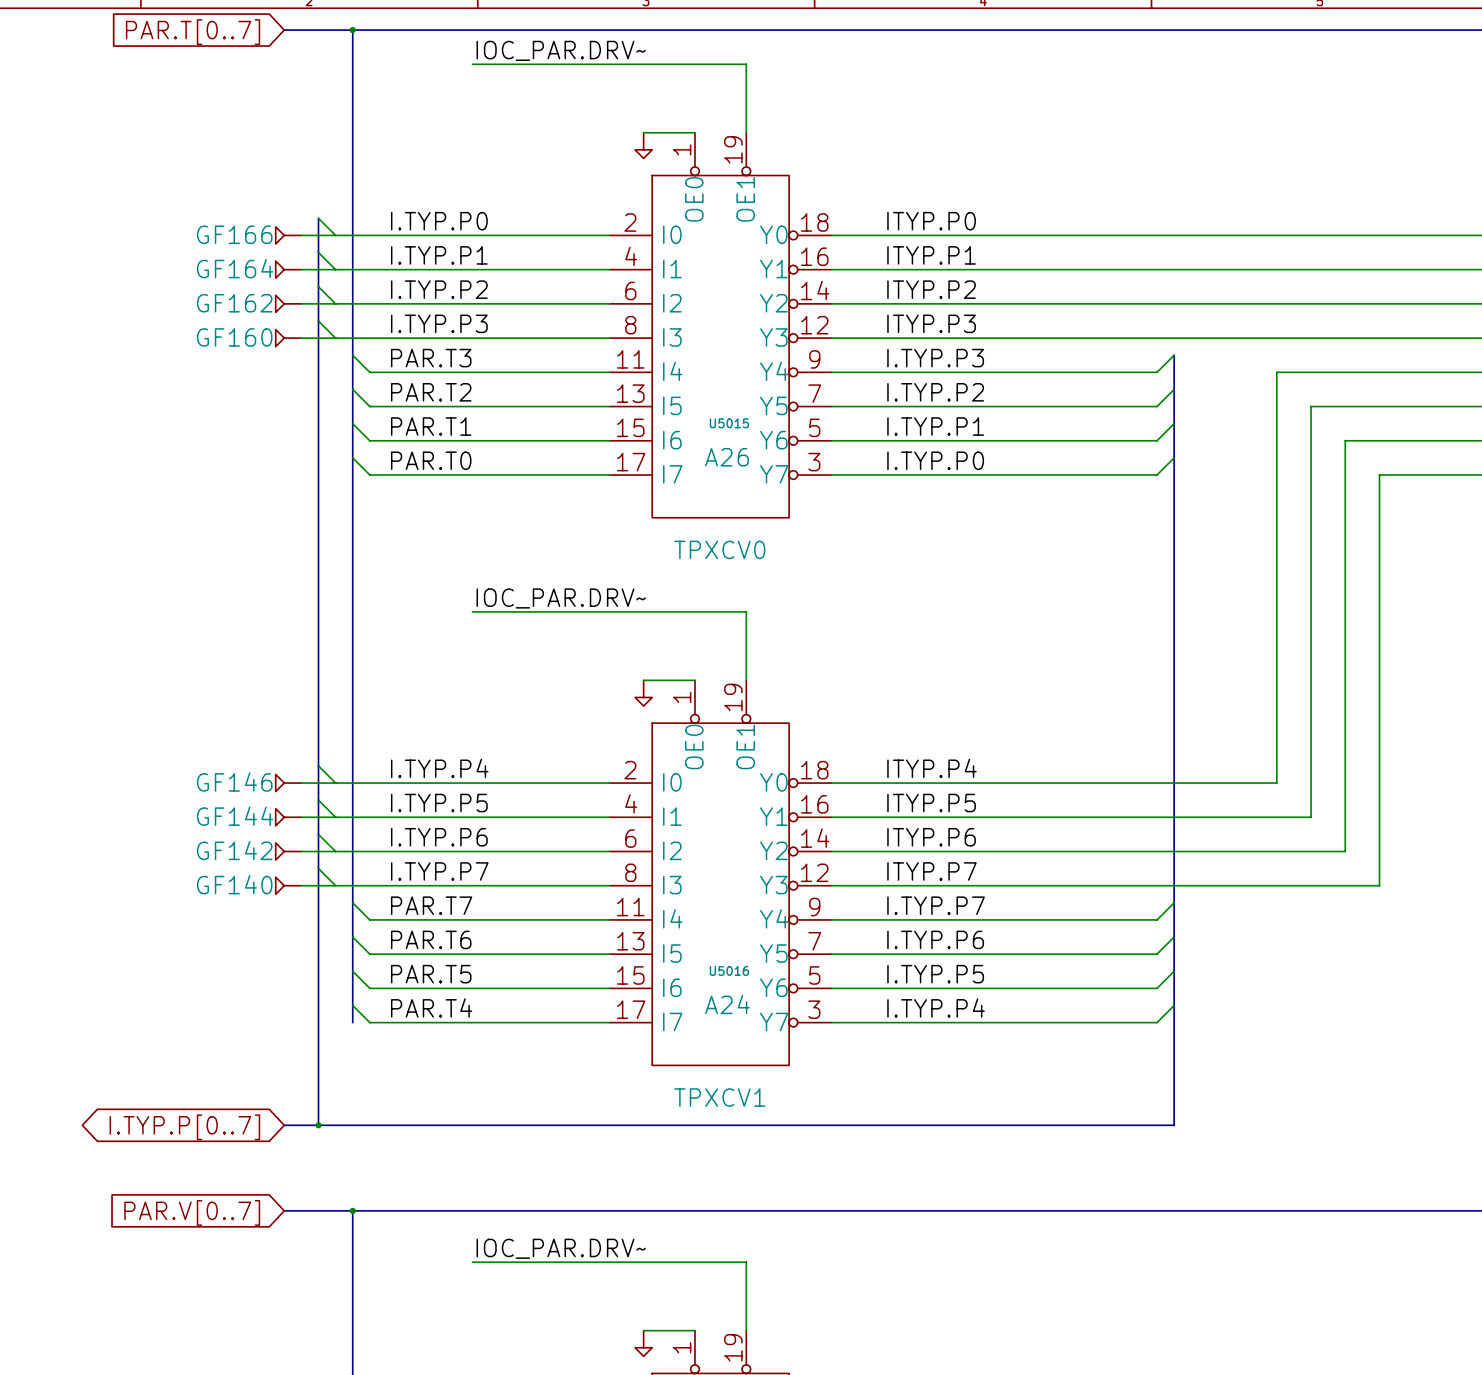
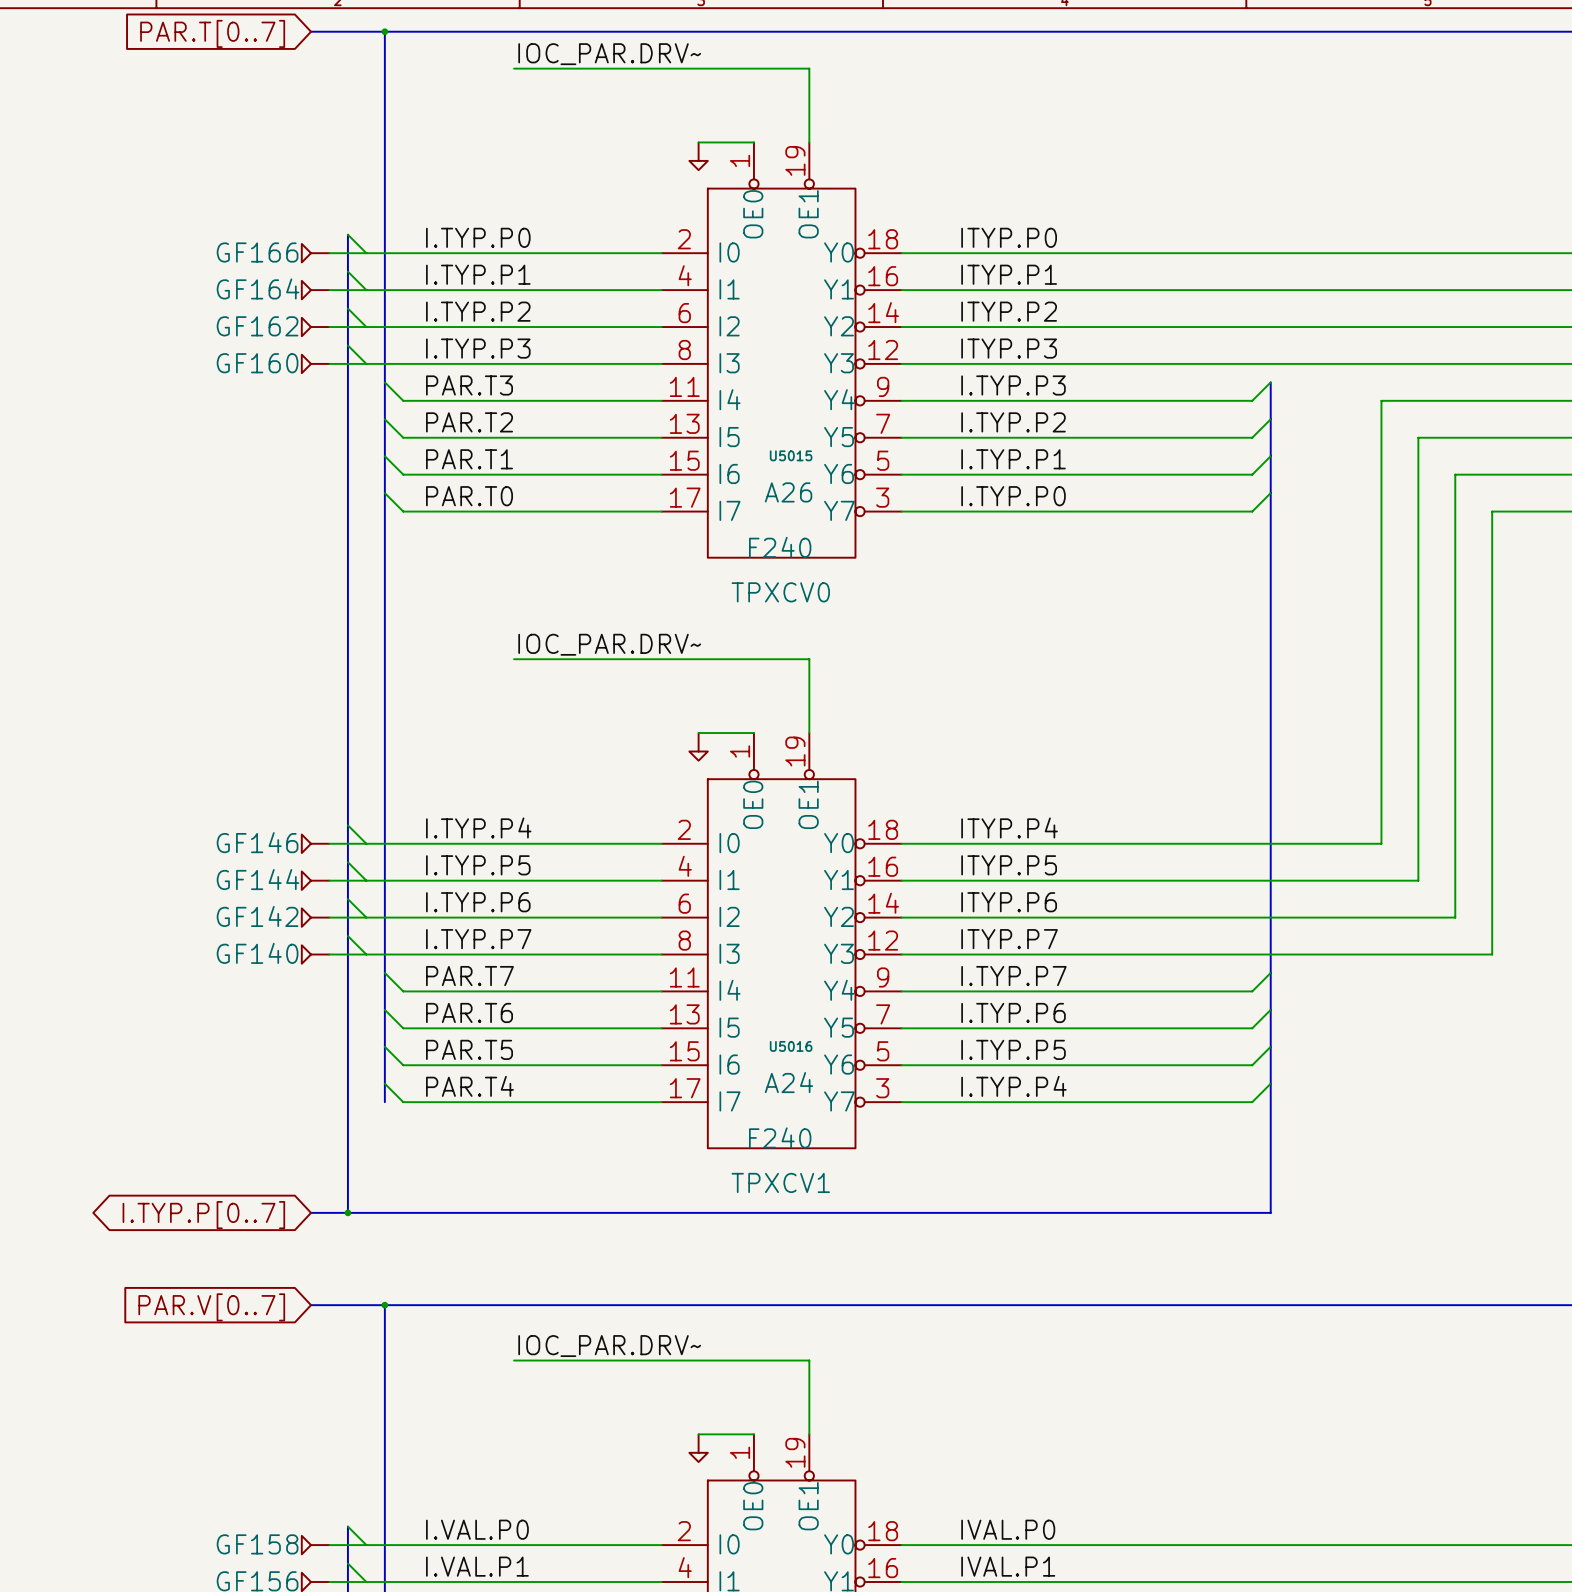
U5015 value: none -> F240 (780, 547)
U5016 value: none -> F240 (780, 1137)

